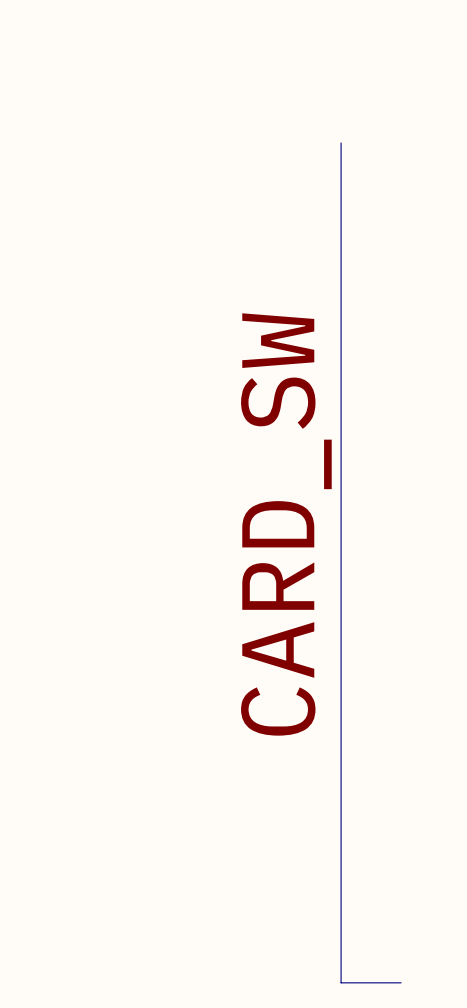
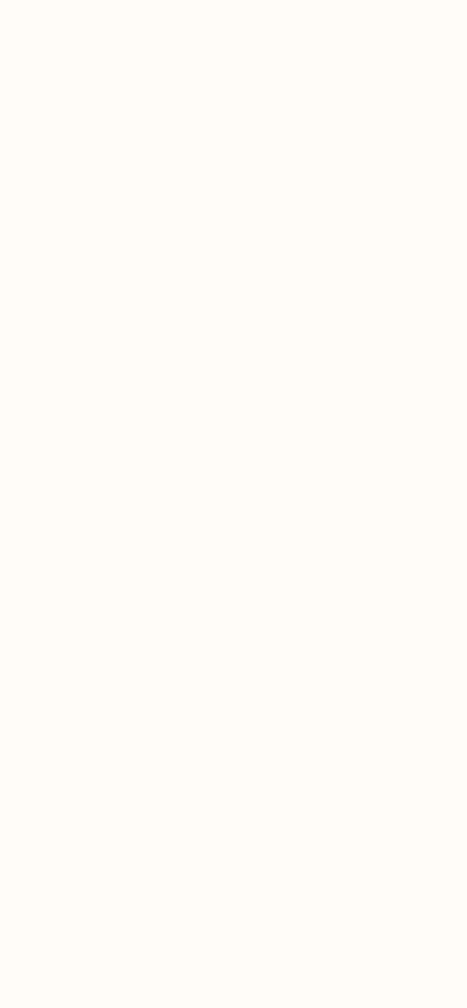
wire: (341, 142) (341, 982) (401, 982) -> none
label: CARD_SW (286, 524) -> none

